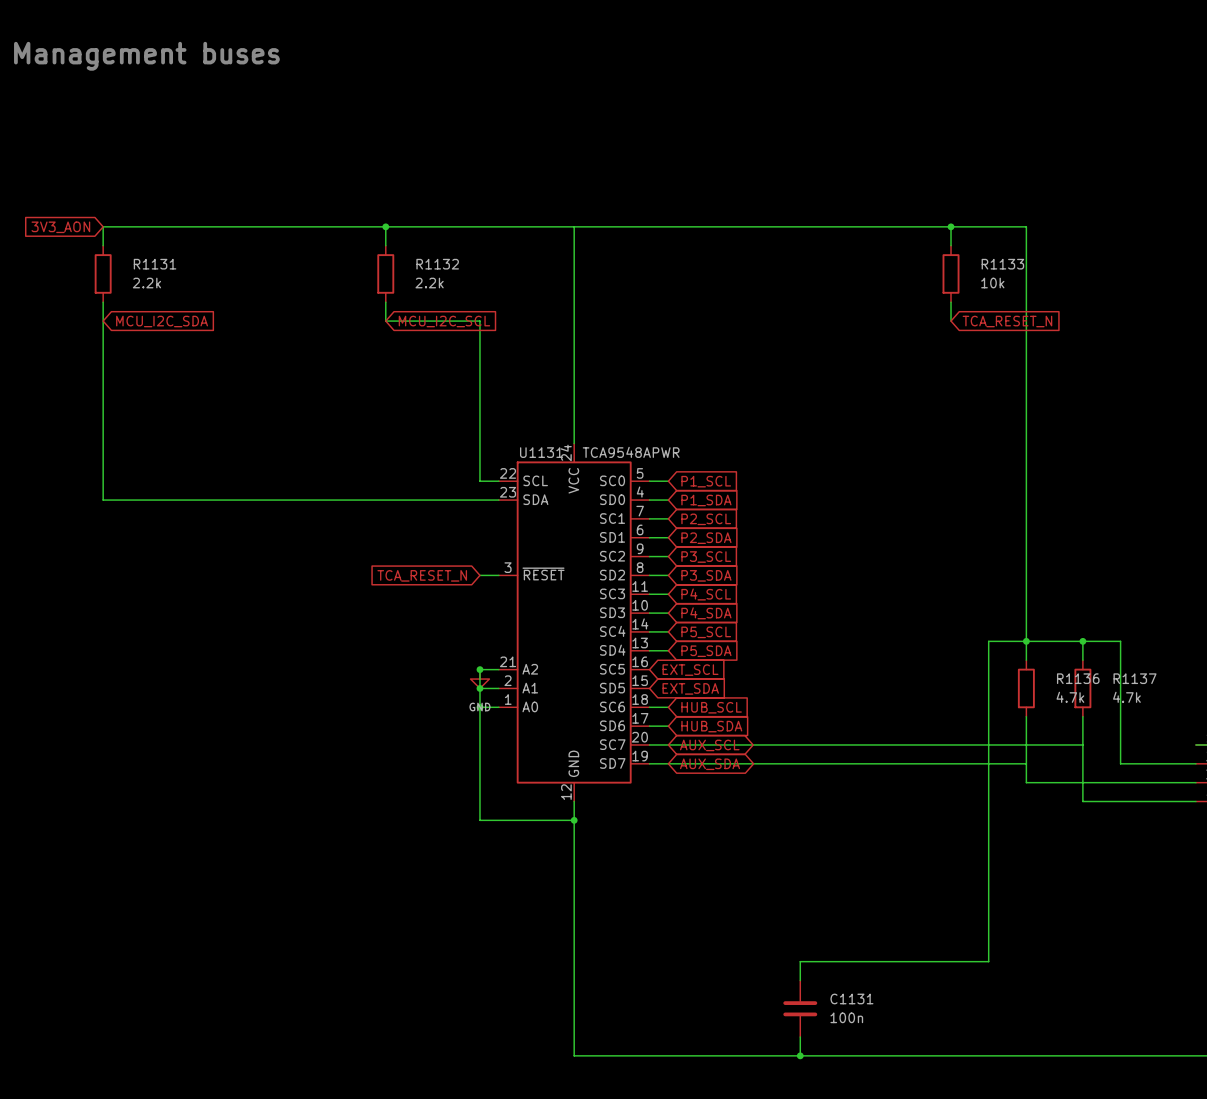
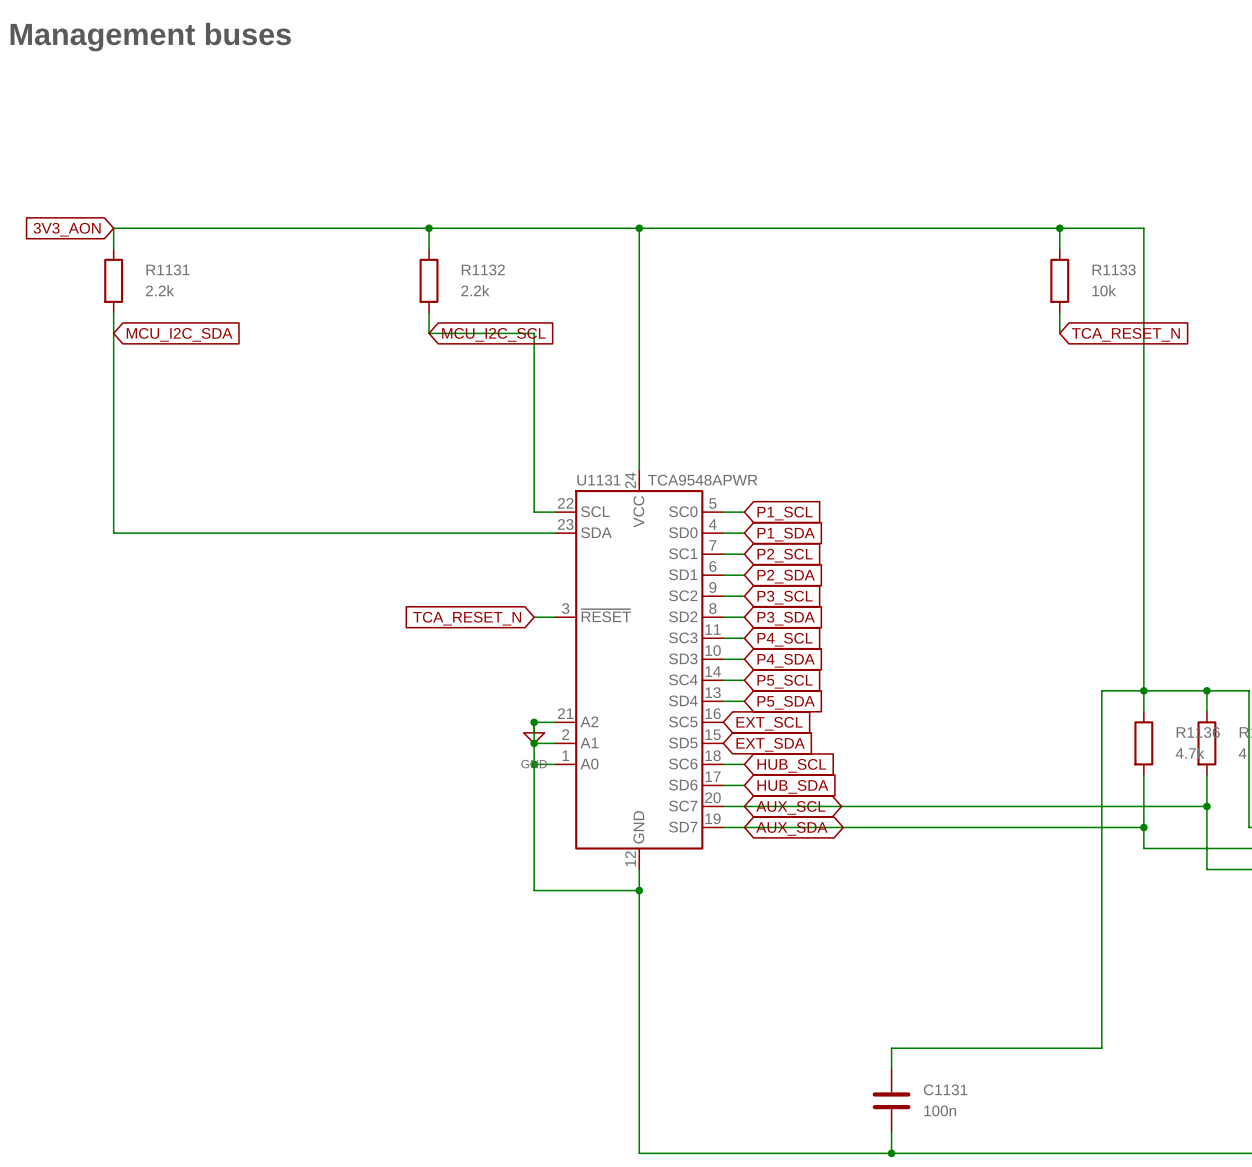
junction: none -> (639, 228)
junction: none -> (1206, 806)
junction: none -> (1143, 827)

